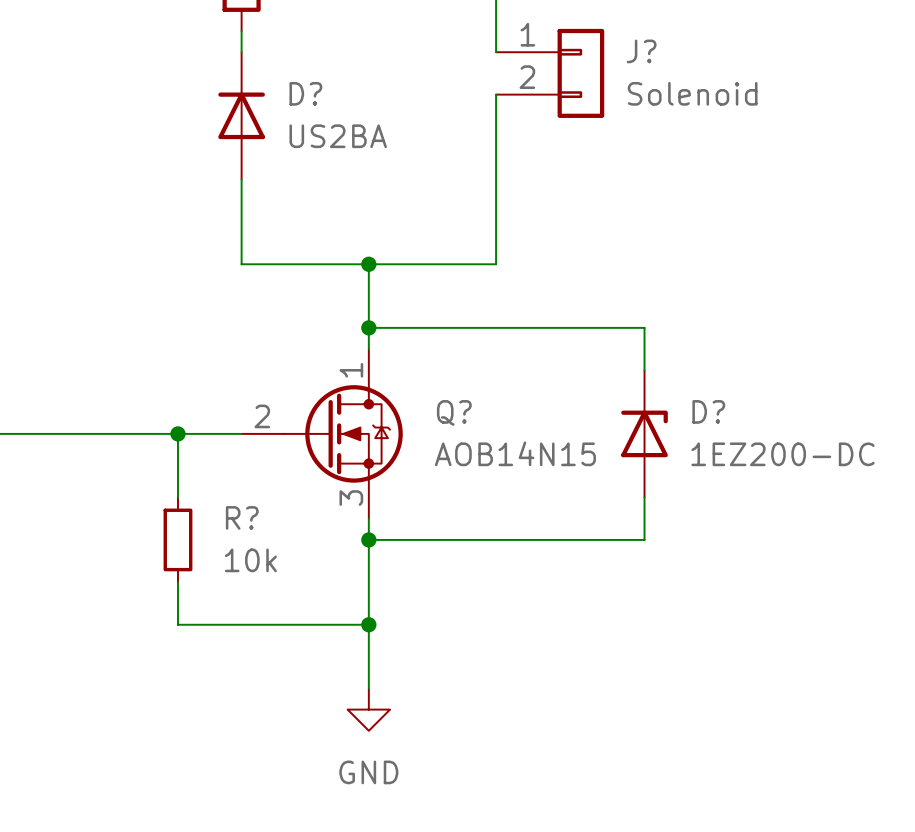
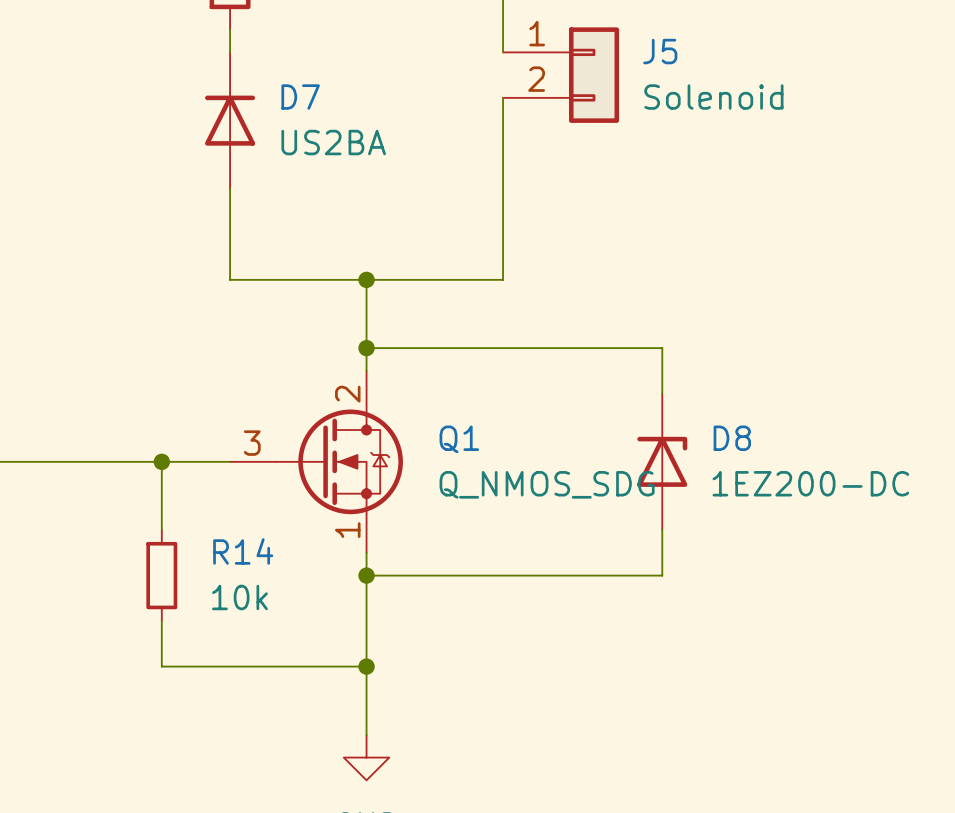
J? name: J? (641, 51) -> J5 (660, 51)
D? name: D? (305, 93) -> D7 (300, 97)
Q? pin number: 1 (351, 370) -> 2 (347, 394)
D? name: D? (708, 411) -> D8 (732, 438)
Q? name: Q? (454, 412) -> Q1 (459, 439)
Q? pin number: 2 (262, 416) -> 3 (252, 443)
Q? value: AOB14N15 (515, 453) -> Q_NMOS_SDG (547, 484)
Q? pin number: 3 (351, 498) -> 1 (347, 530)
R? name: R? (242, 517) -> R14 (243, 551)

